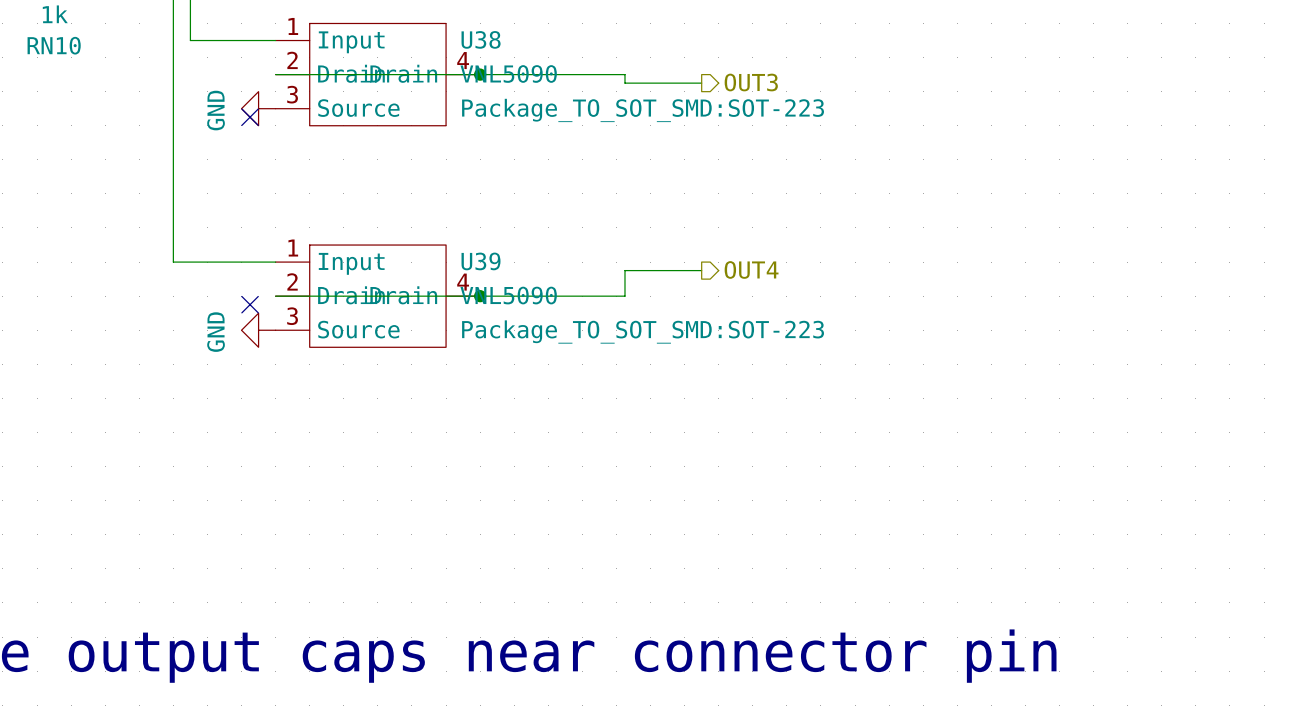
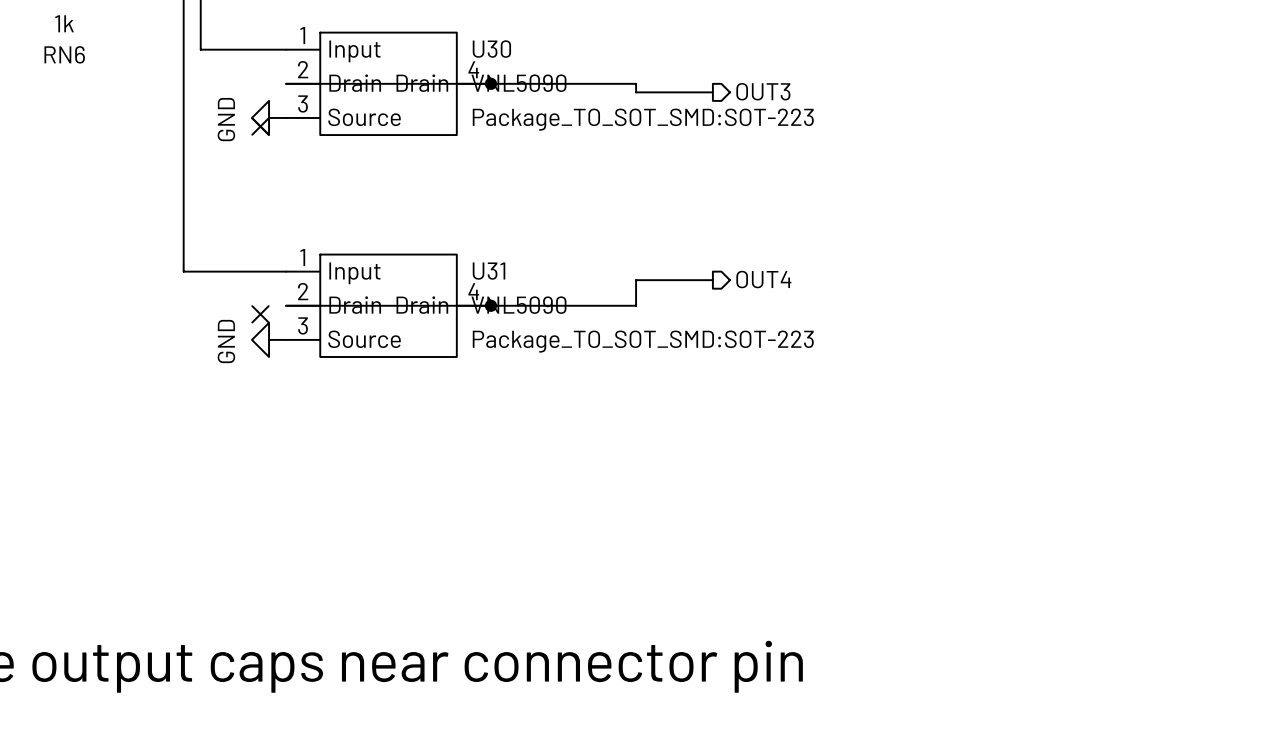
U38 name: U38 (481, 39) -> U30 (491, 49)
RN10 name: RN10 (54, 45) -> RN6 (64, 54)
U39 name: U39 (481, 261) -> U31 (489, 271)

